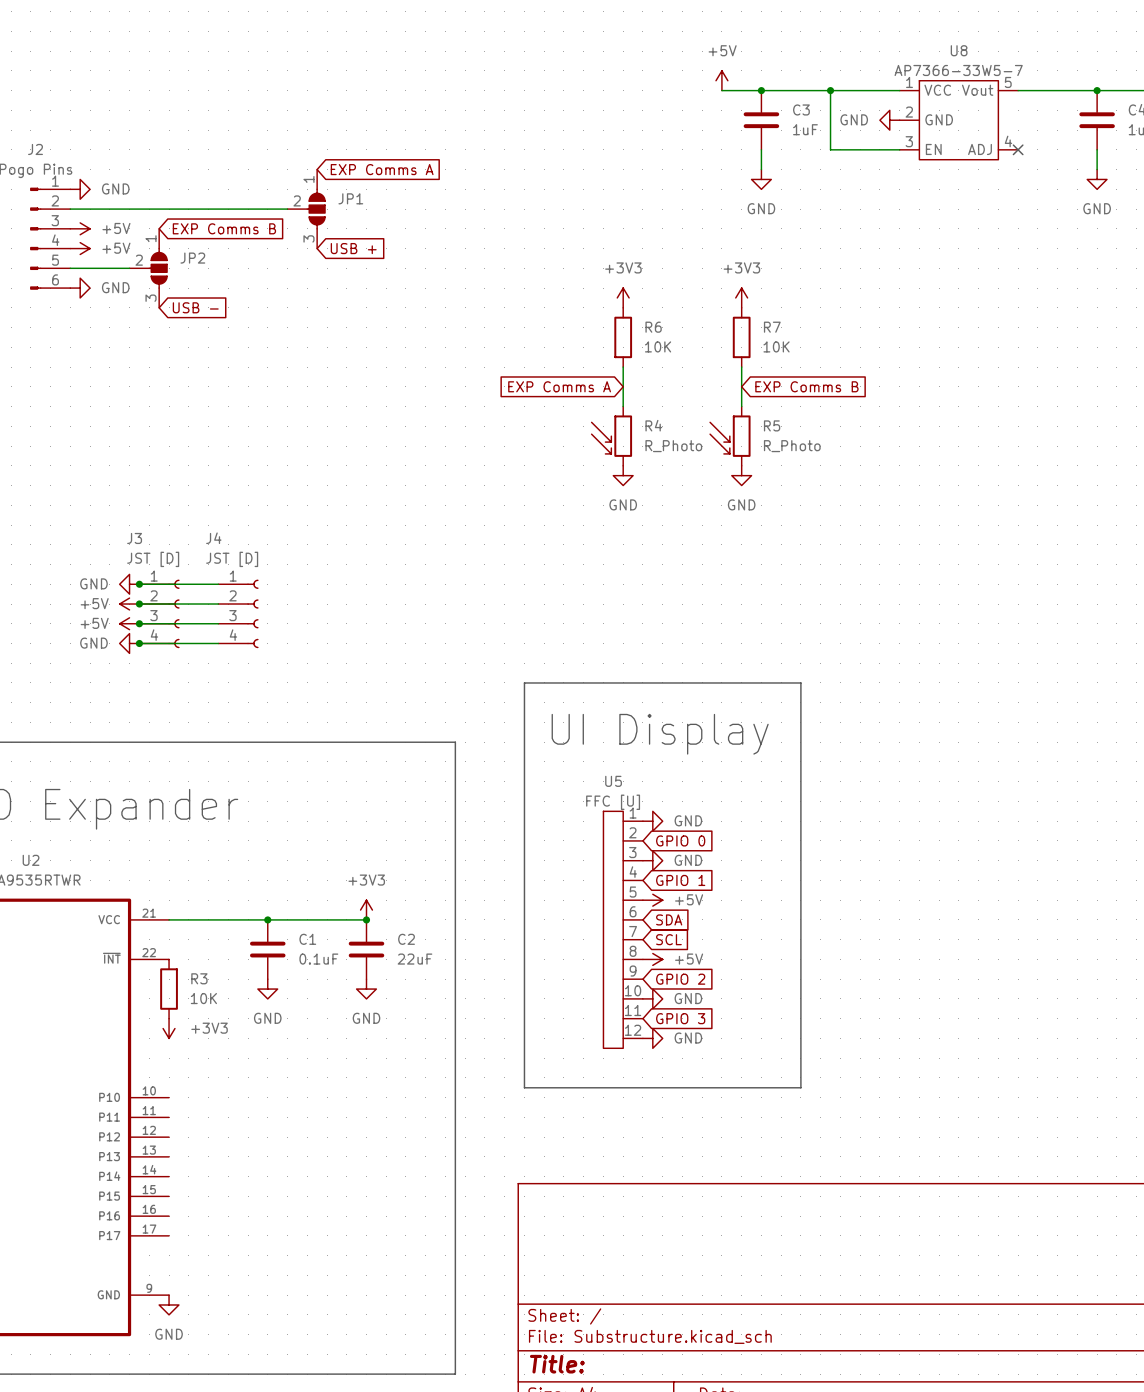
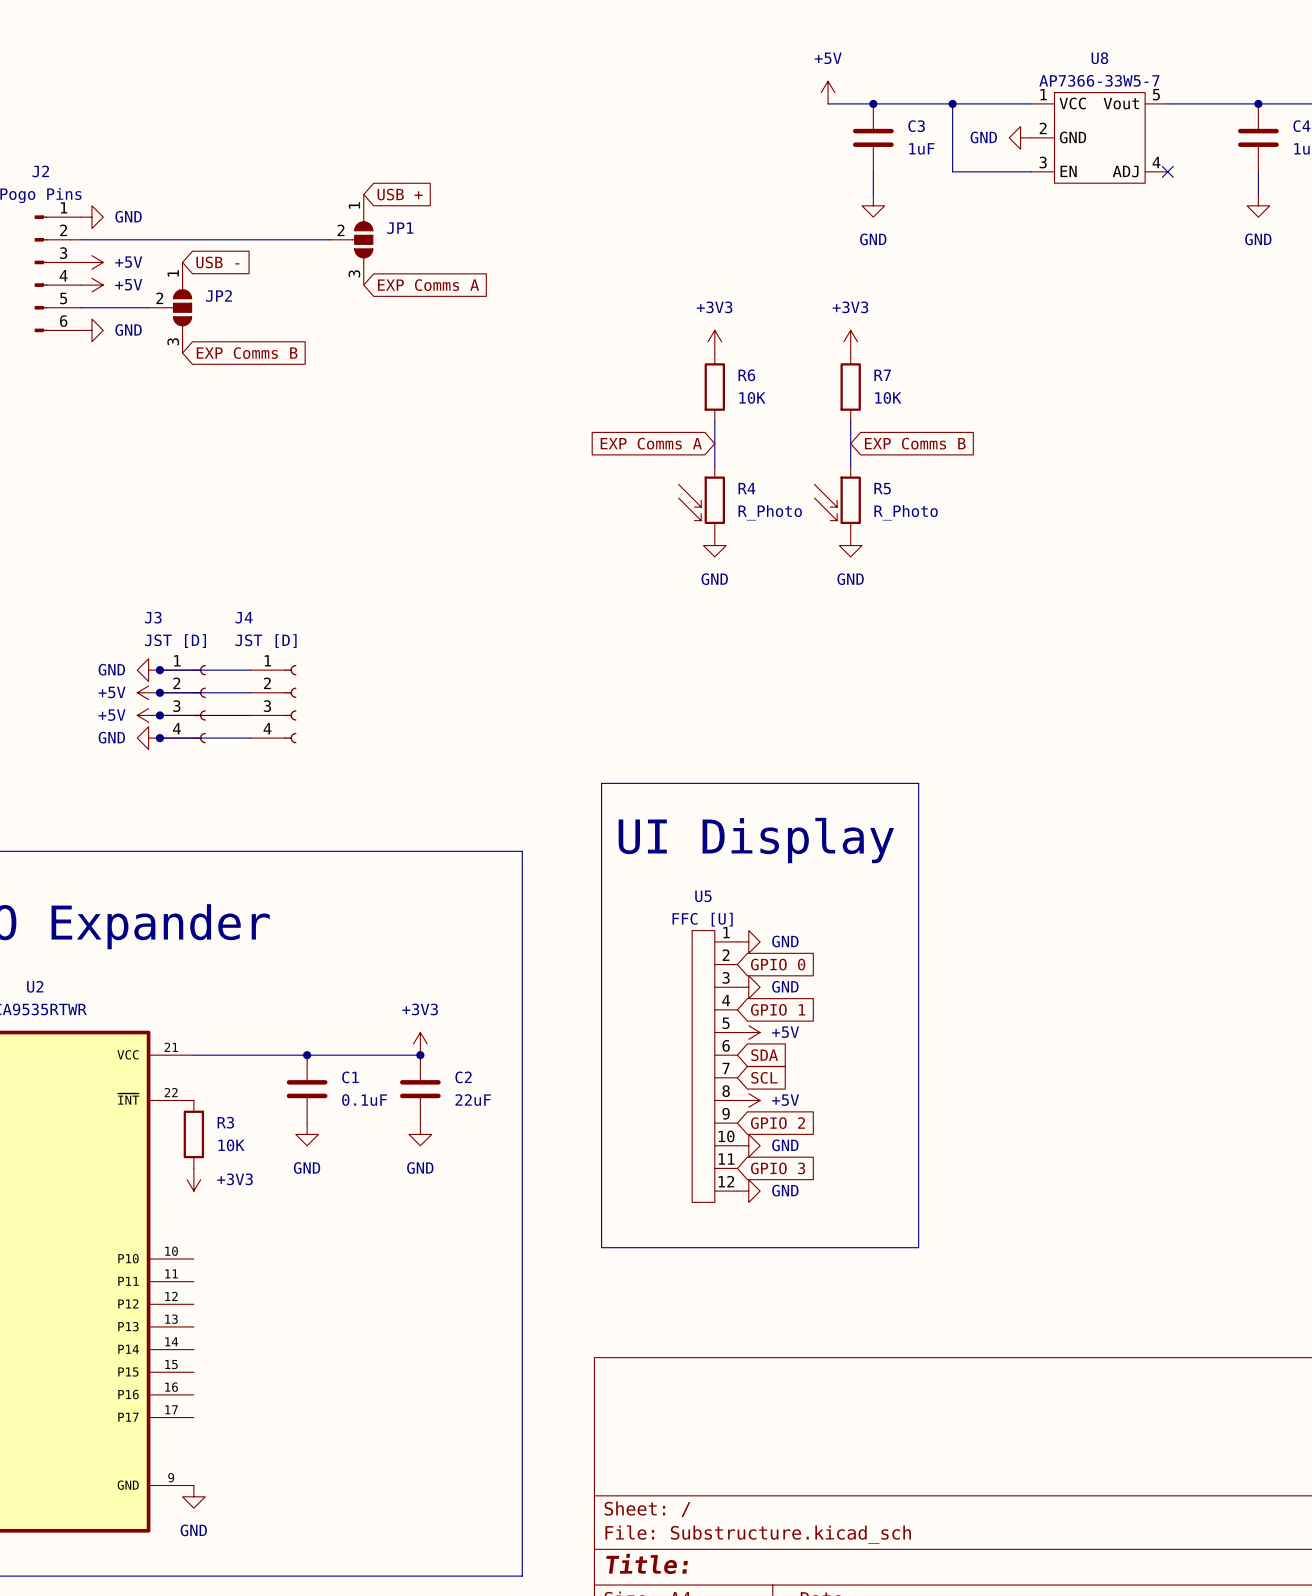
global label: EXP Comms A (382, 169) -> USB + (400, 194)
global label: EXP Comms B (224, 228) -> USB - (217, 262)
global label: USB + (353, 248) -> EXP Comms A (428, 285)
global label: USB - (195, 307) -> EXP Comms B (247, 353)

